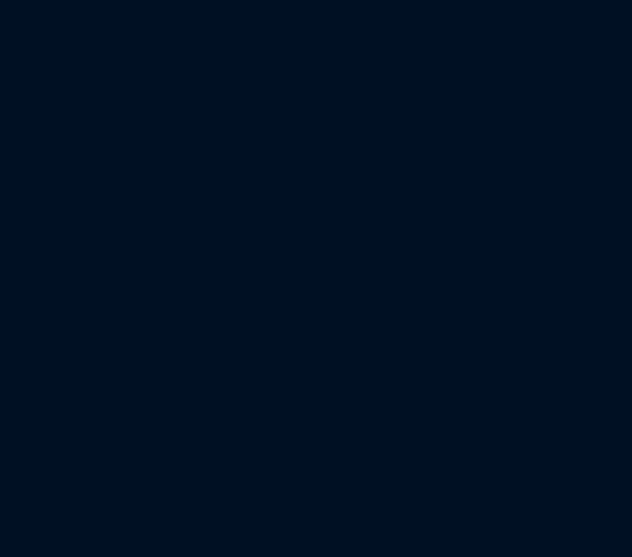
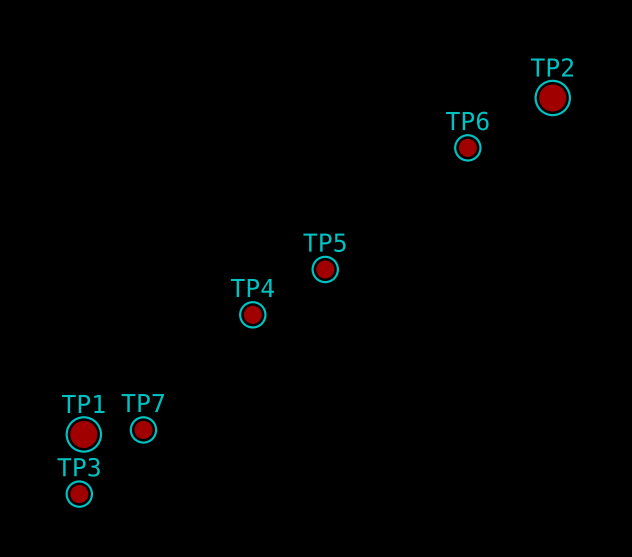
TP2: none -> (552, 97)
TP6: none -> (467, 147)
TP5: none -> (325, 269)
TP4: none -> (252, 314)
TP7: none -> (143, 429)
TP1: none -> (83, 434)
TP3: none -> (79, 494)

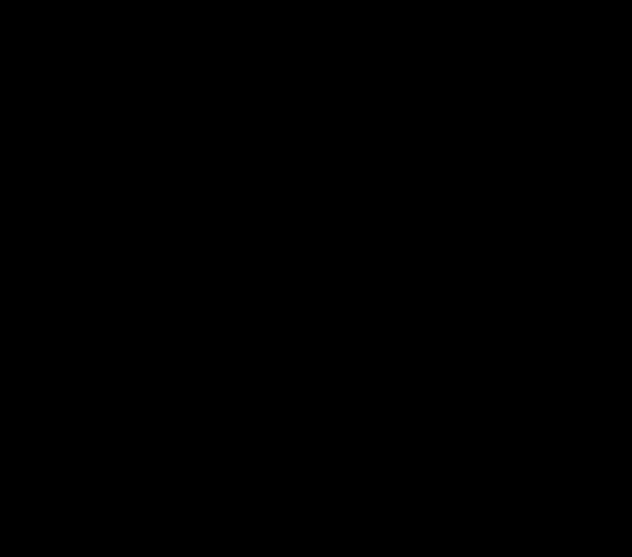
TP2: (552, 97) -> none
TP6: (467, 147) -> none
TP5: (325, 269) -> none
TP4: (252, 314) -> none
TP7: (143, 429) -> none
TP1: (83, 434) -> none
TP3: (79, 494) -> none

